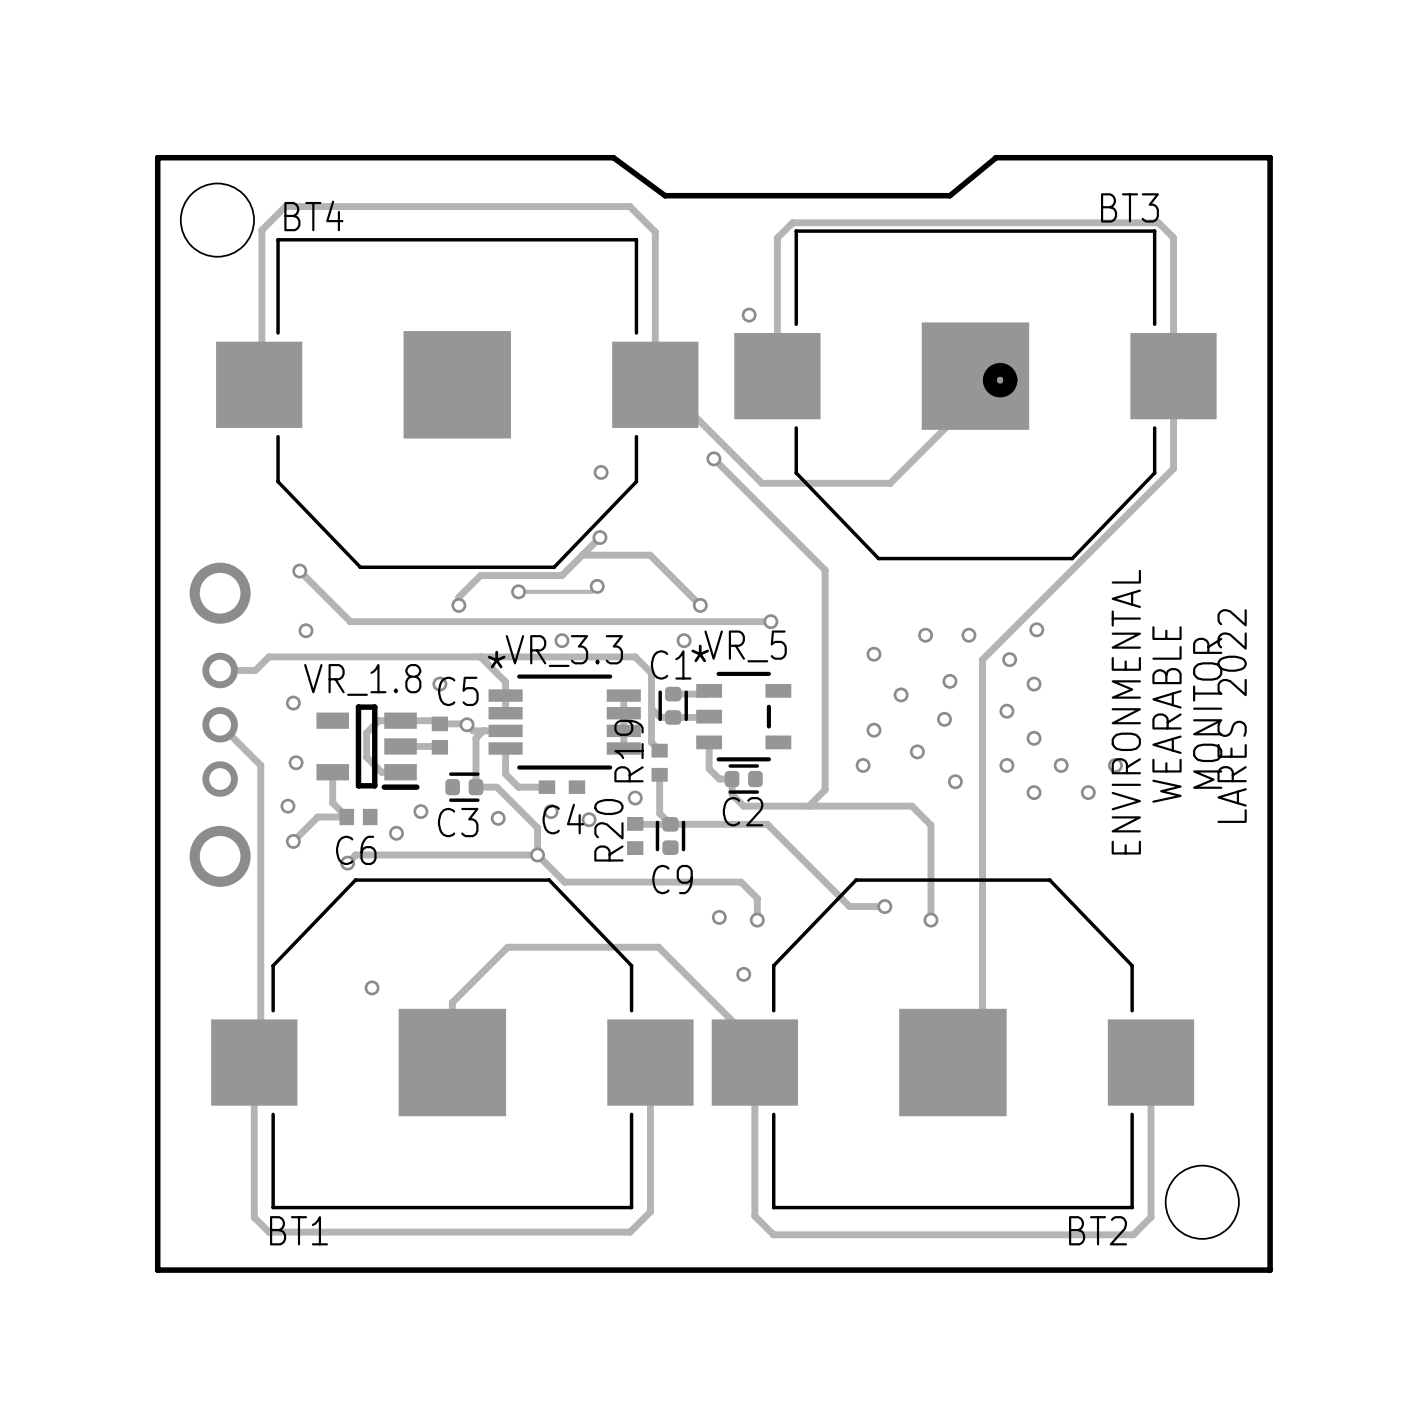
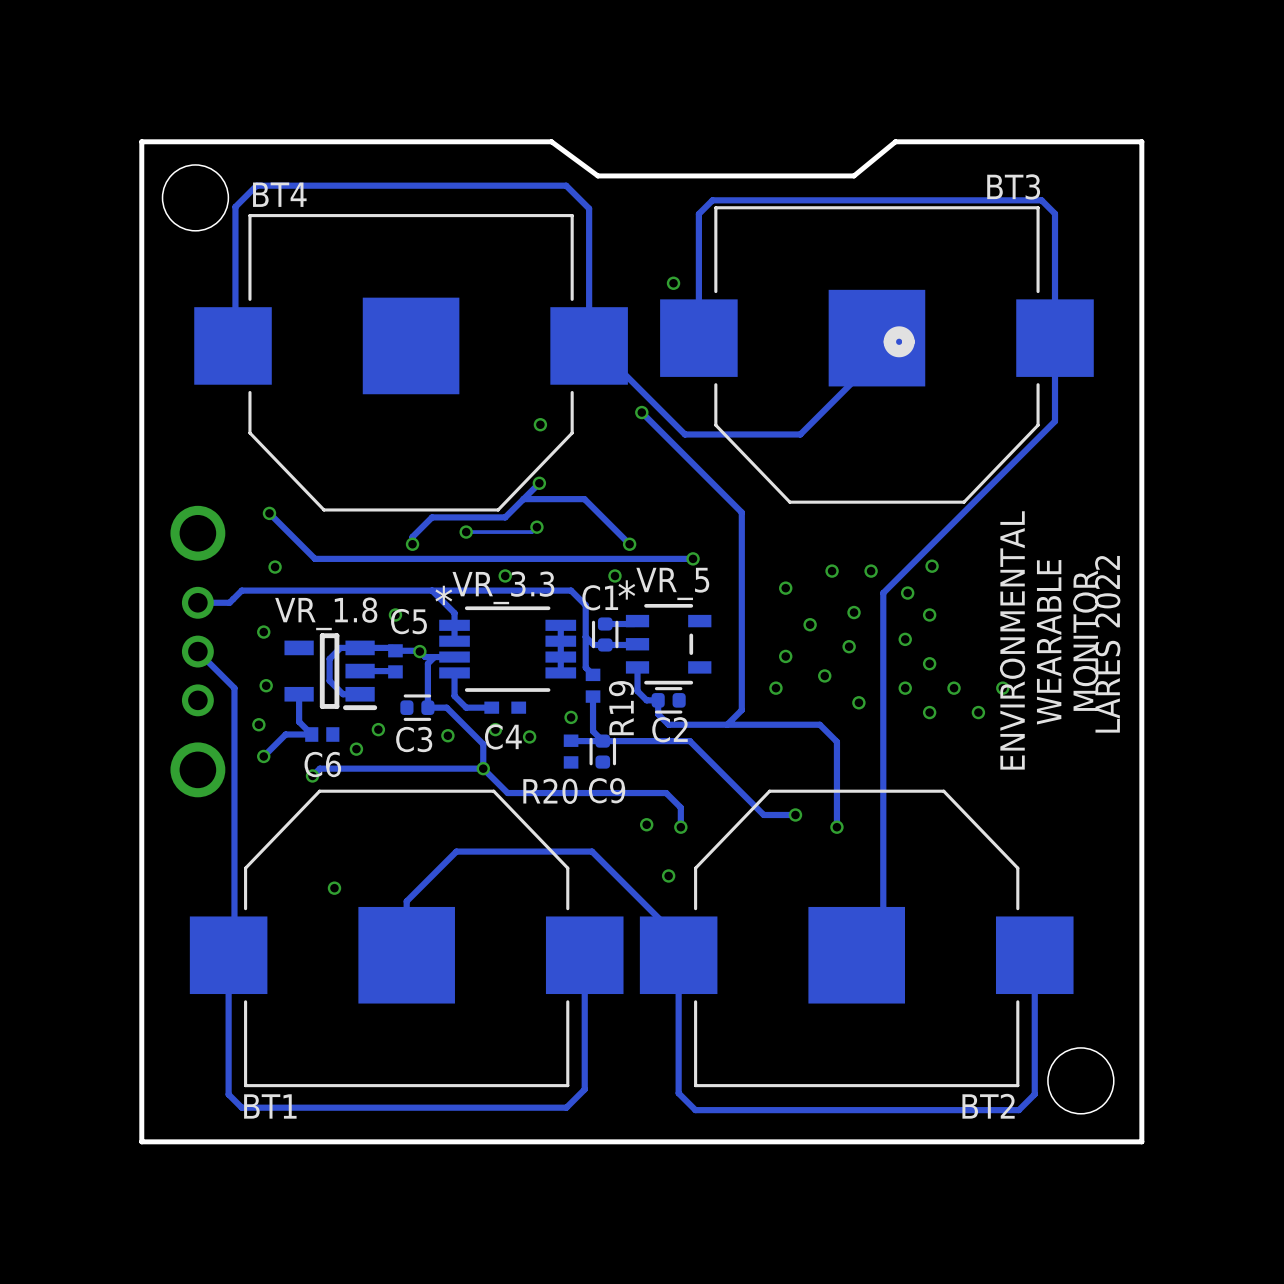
R19 name position: R19 (628, 751) -> R19 (621, 708)
R20 name rotation: 0° (608, 830) -> 90° clockwise (550, 791)

